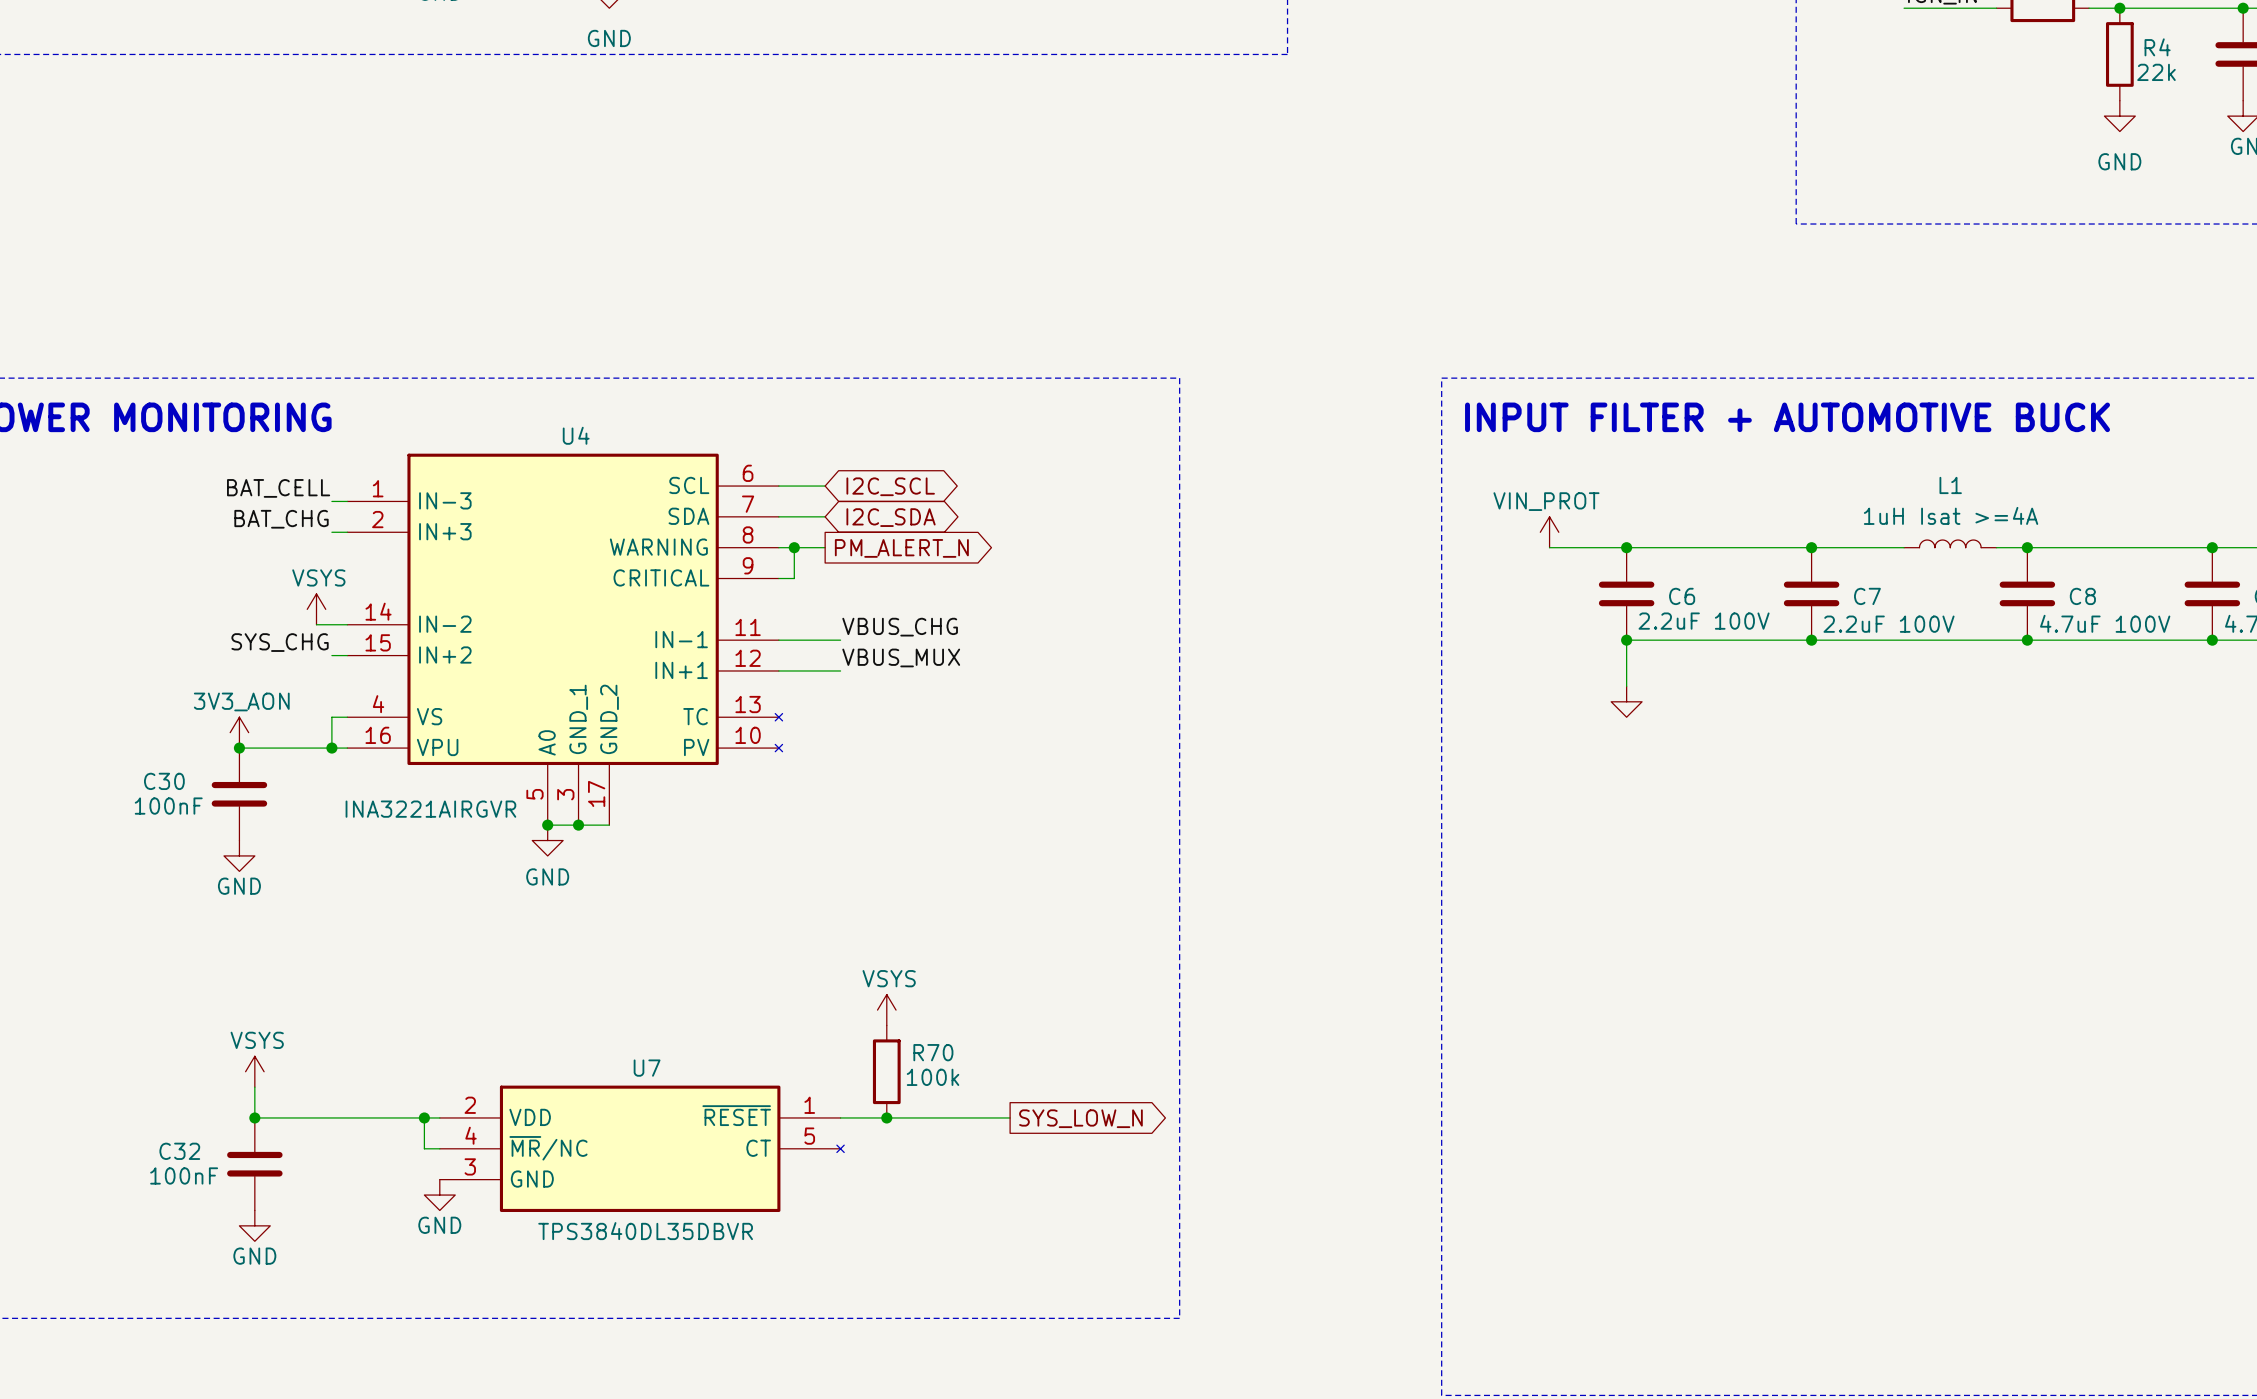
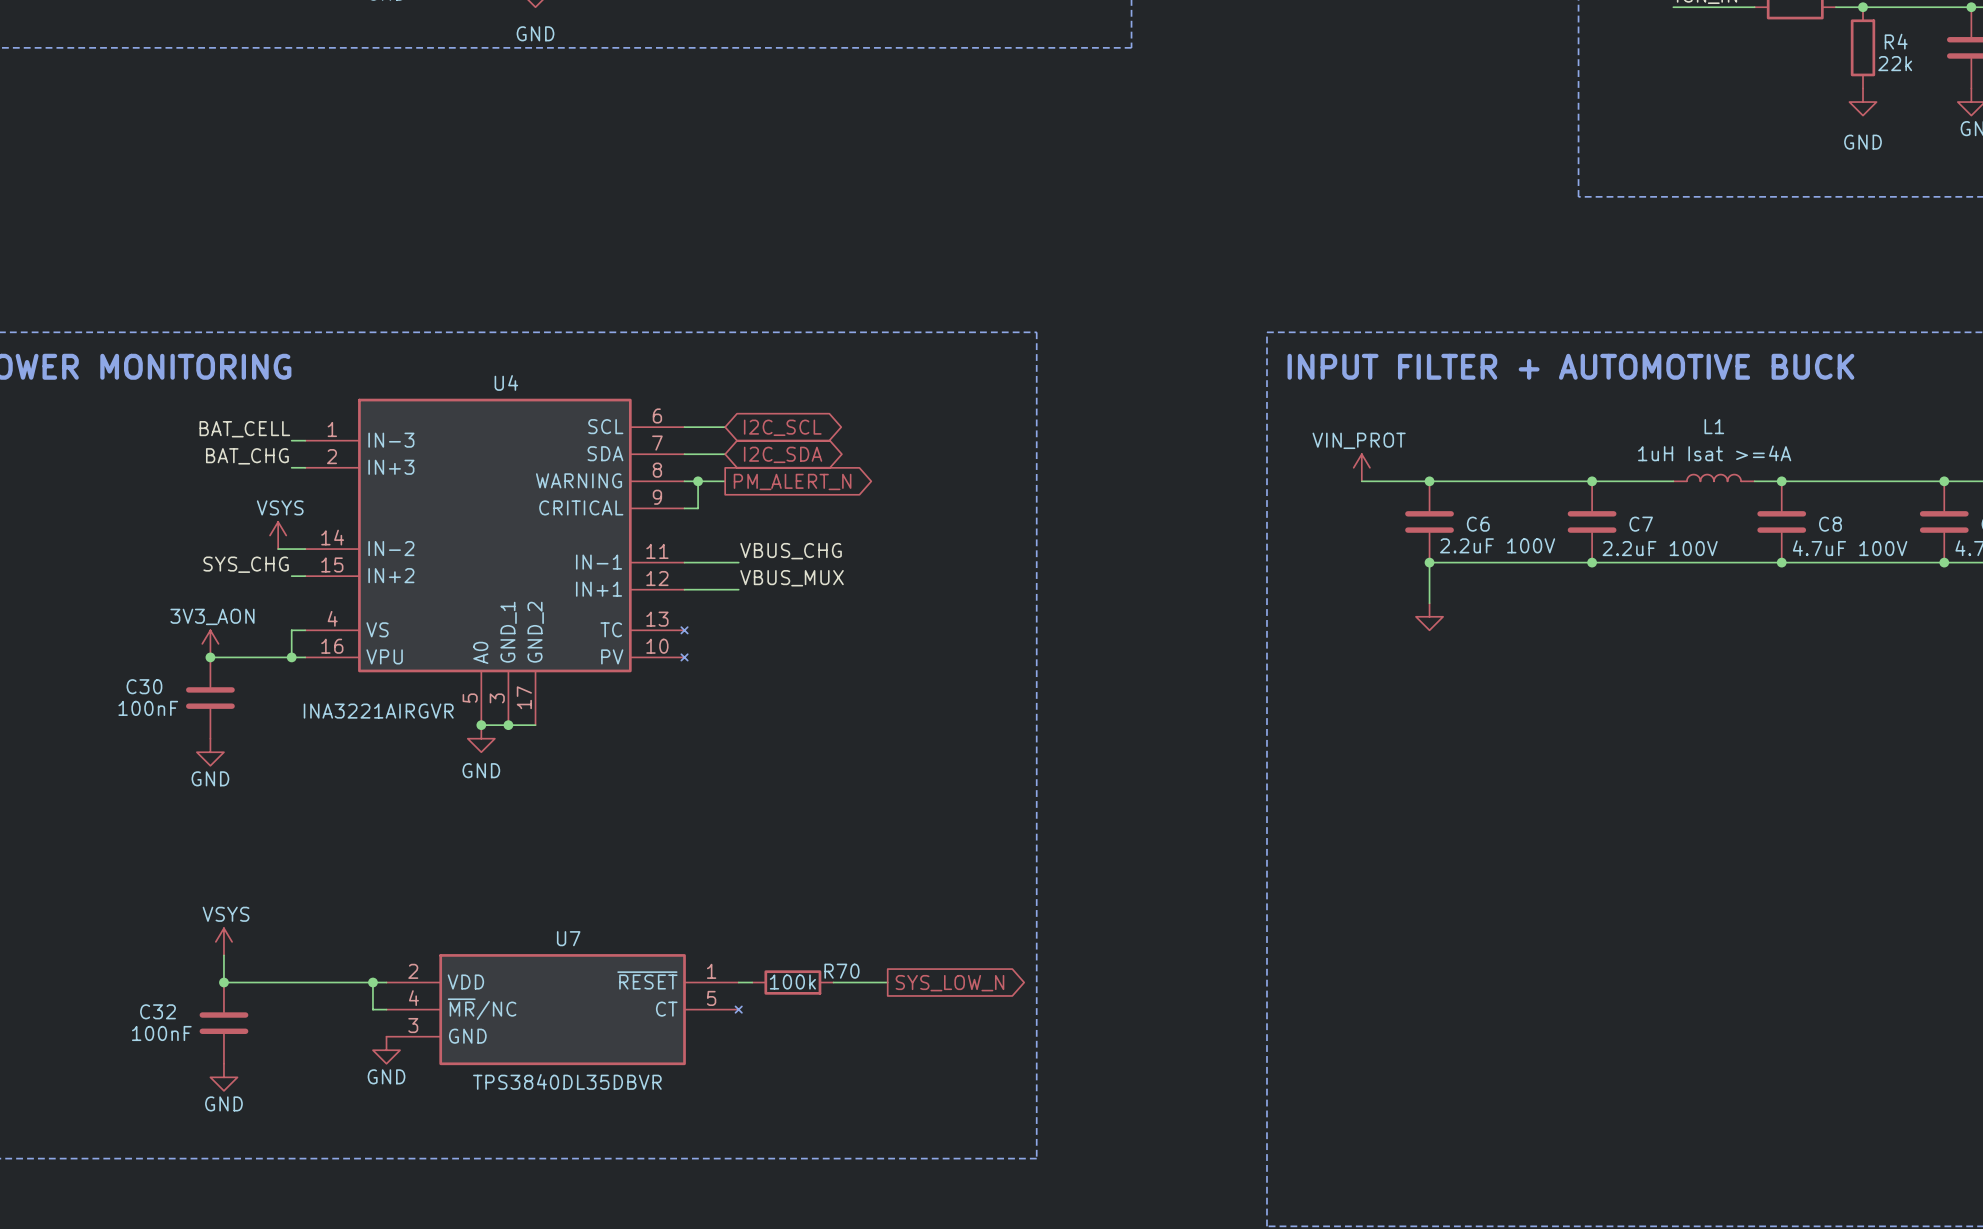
power symbol: VSYS (886, 1010) -> none
R70 rotation: 0° (886, 1071) -> 90° clockwise (792, 982)
R70 value position: 100k (933, 1077) -> 100k (792, 982)
wire: (855, 1117) (948, 1117) -> none
junction: (886, 1117) -> none

